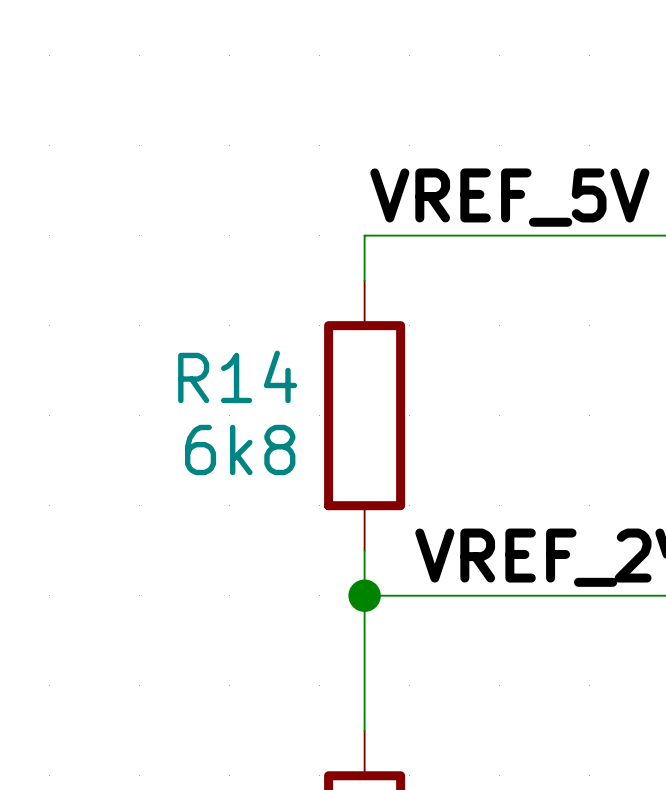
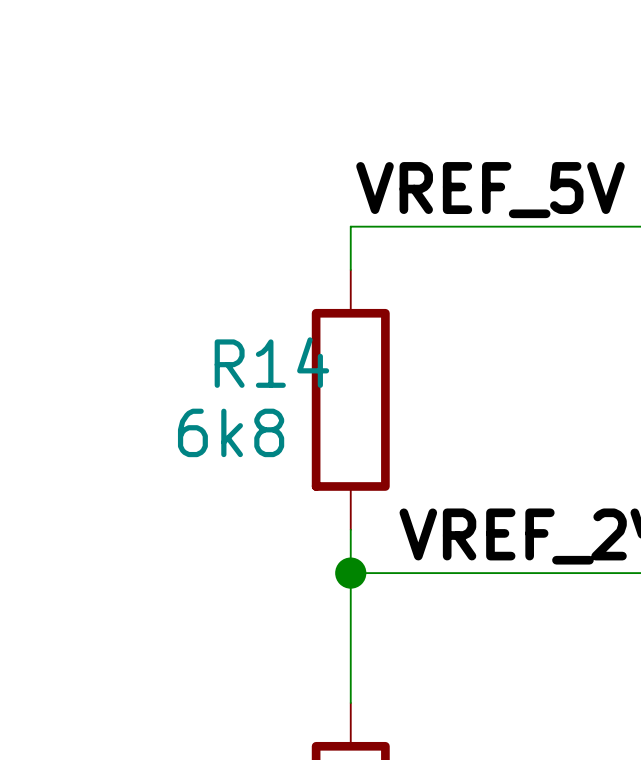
R14 name position: R14 (237, 376) -> R14 (271, 362)

